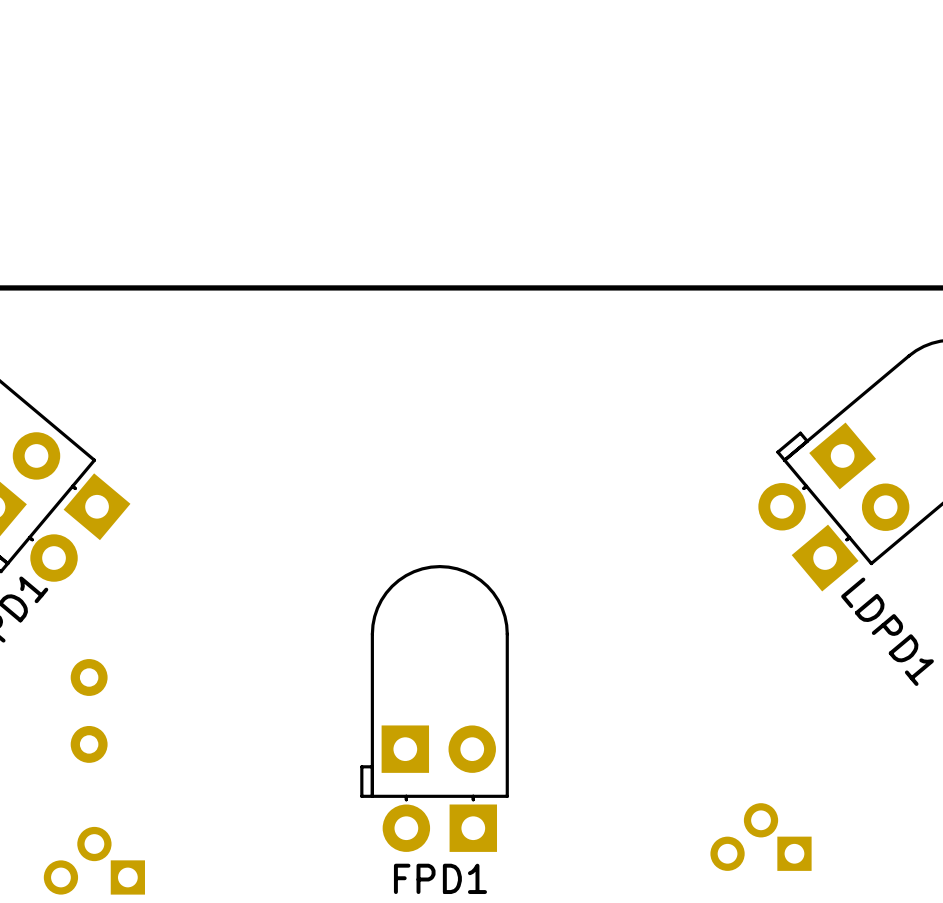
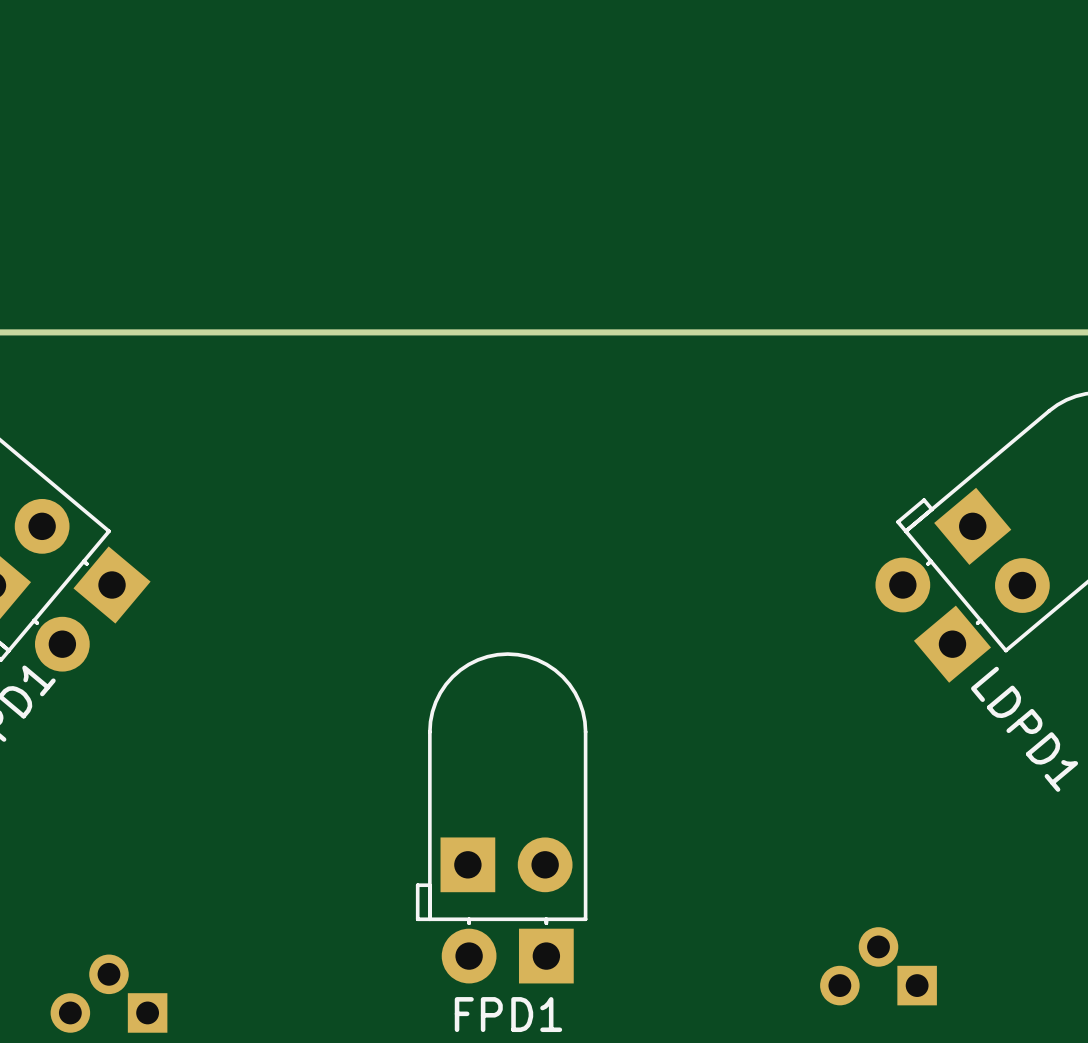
part: (89, 710) -> none

